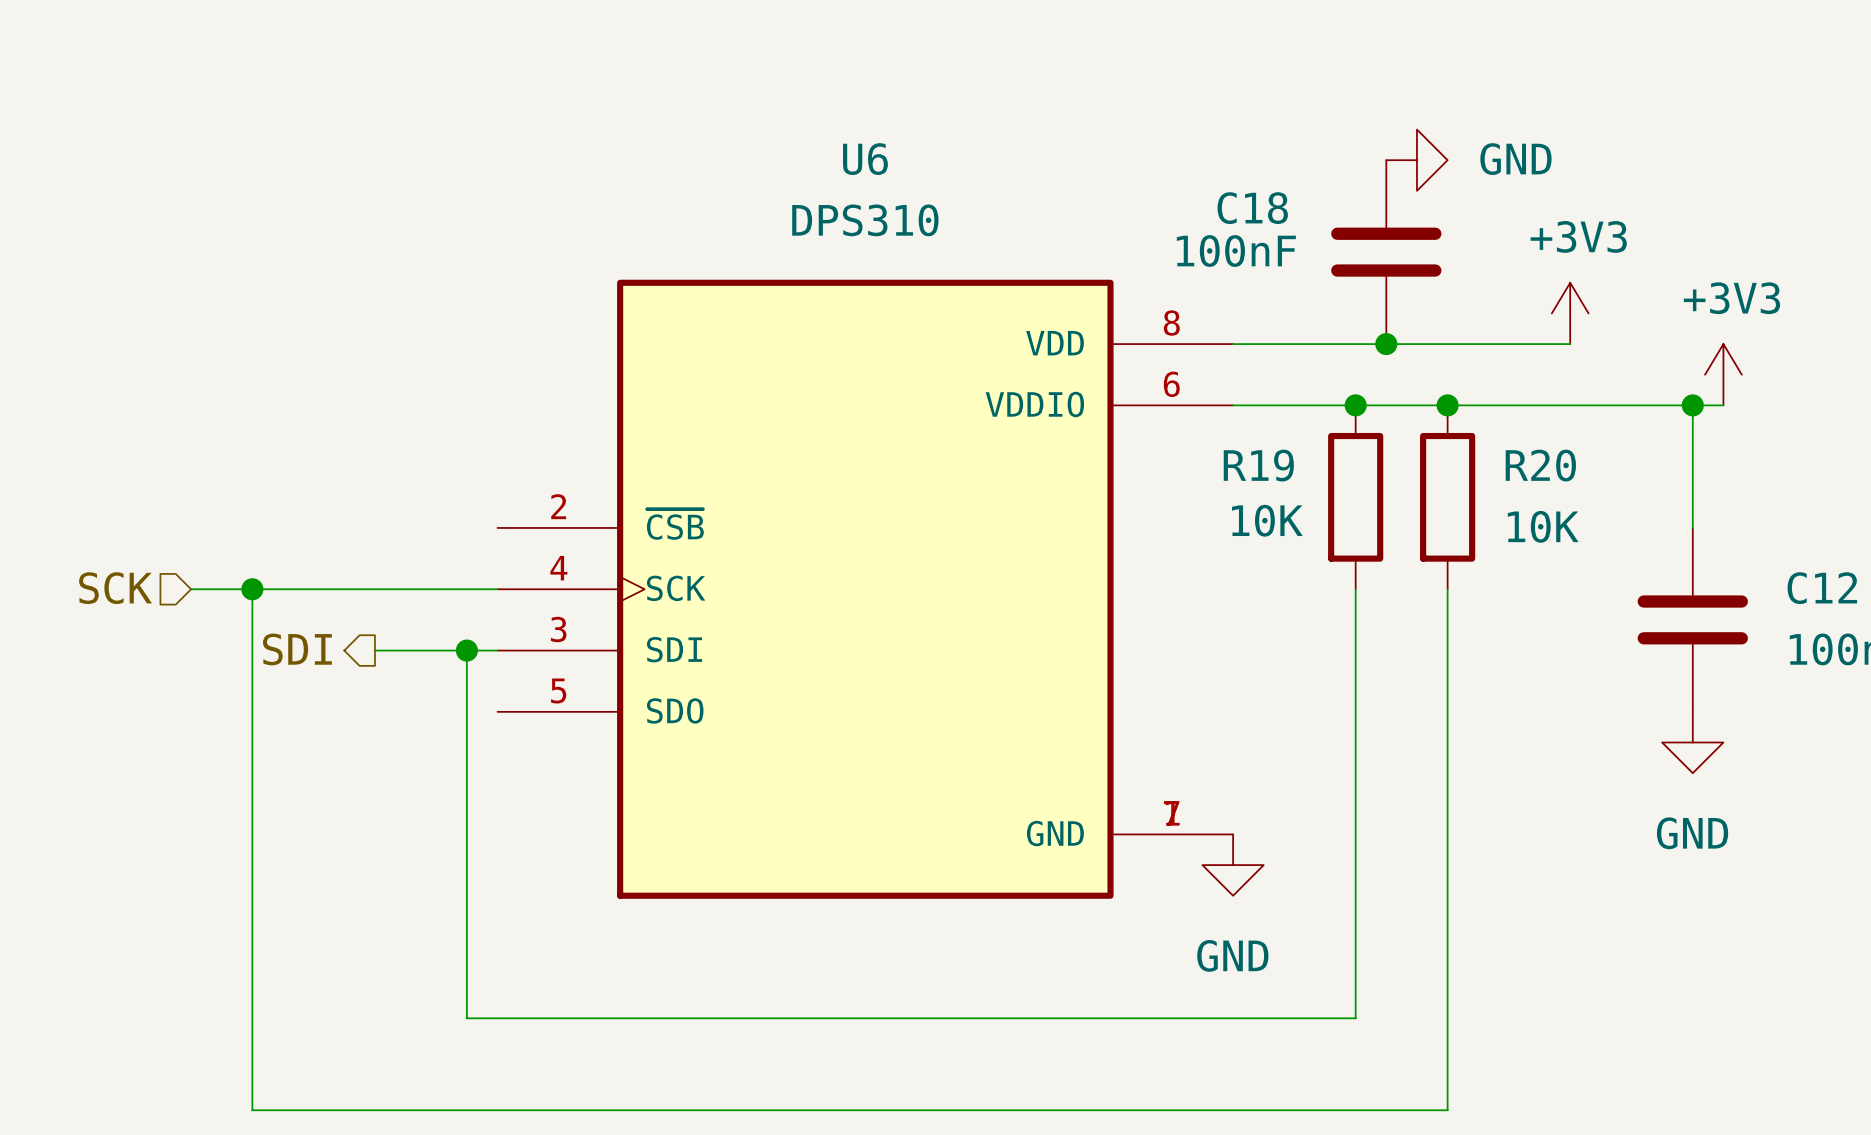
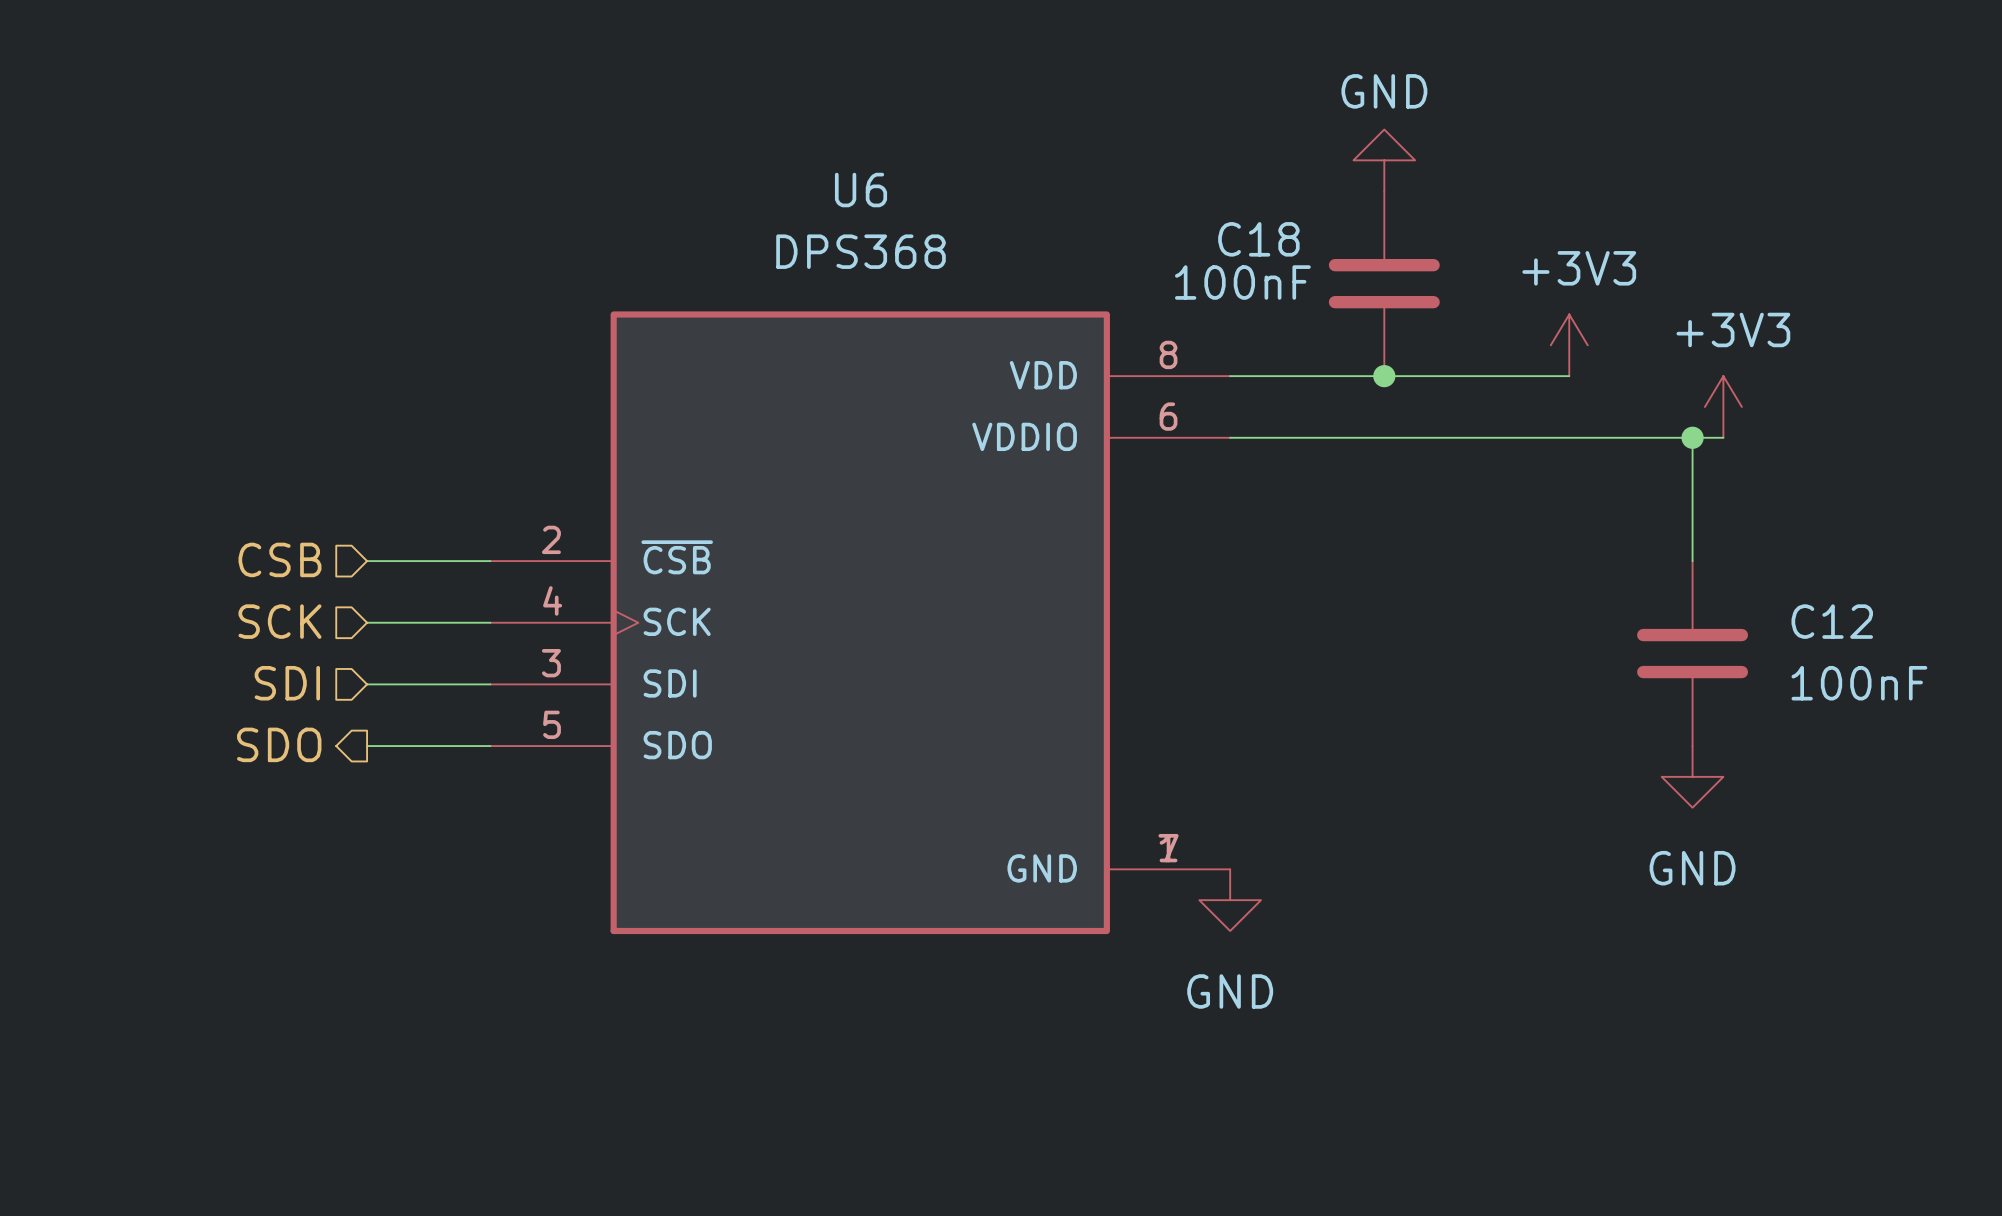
power symbol text position: GND (1515, 159) -> GND (1384, 91)
power symbol rotation: 0° (1416, 160) -> 90° counterclockwise (1384, 160)
power symbol position: GND (1416, 160) -> GND (1384, 160)
U6 value: DPS310 (865, 220) -> DPS368 (861, 251)
junction: (1355, 405) -> none
junction: (1447, 405) -> none
R19: 10K (1355, 497) -> none
R20: 10K (1447, 497) -> none
hierarchical label: none -> CSB (279, 559)
wire: none -> (367, 561) (490, 561)
hierarchical label position: SCK (115, 588) -> SCK (279, 621)
wire: (191, 589) (374, 589) -> none
wire: (252, 589) (252, 1110) (1447, 1110) (1447, 589) -> none
junction: (252, 589) -> none
wire: (1355, 589) (1355, 1018) (466, 1018) (466, 650) -> none
hierarchical label shape: output (297, 649) -> input (287, 683)
junction: (466, 650) -> none
hierarchical label: none -> SDO (279, 744)
wire: none -> (367, 746) (490, 746)

